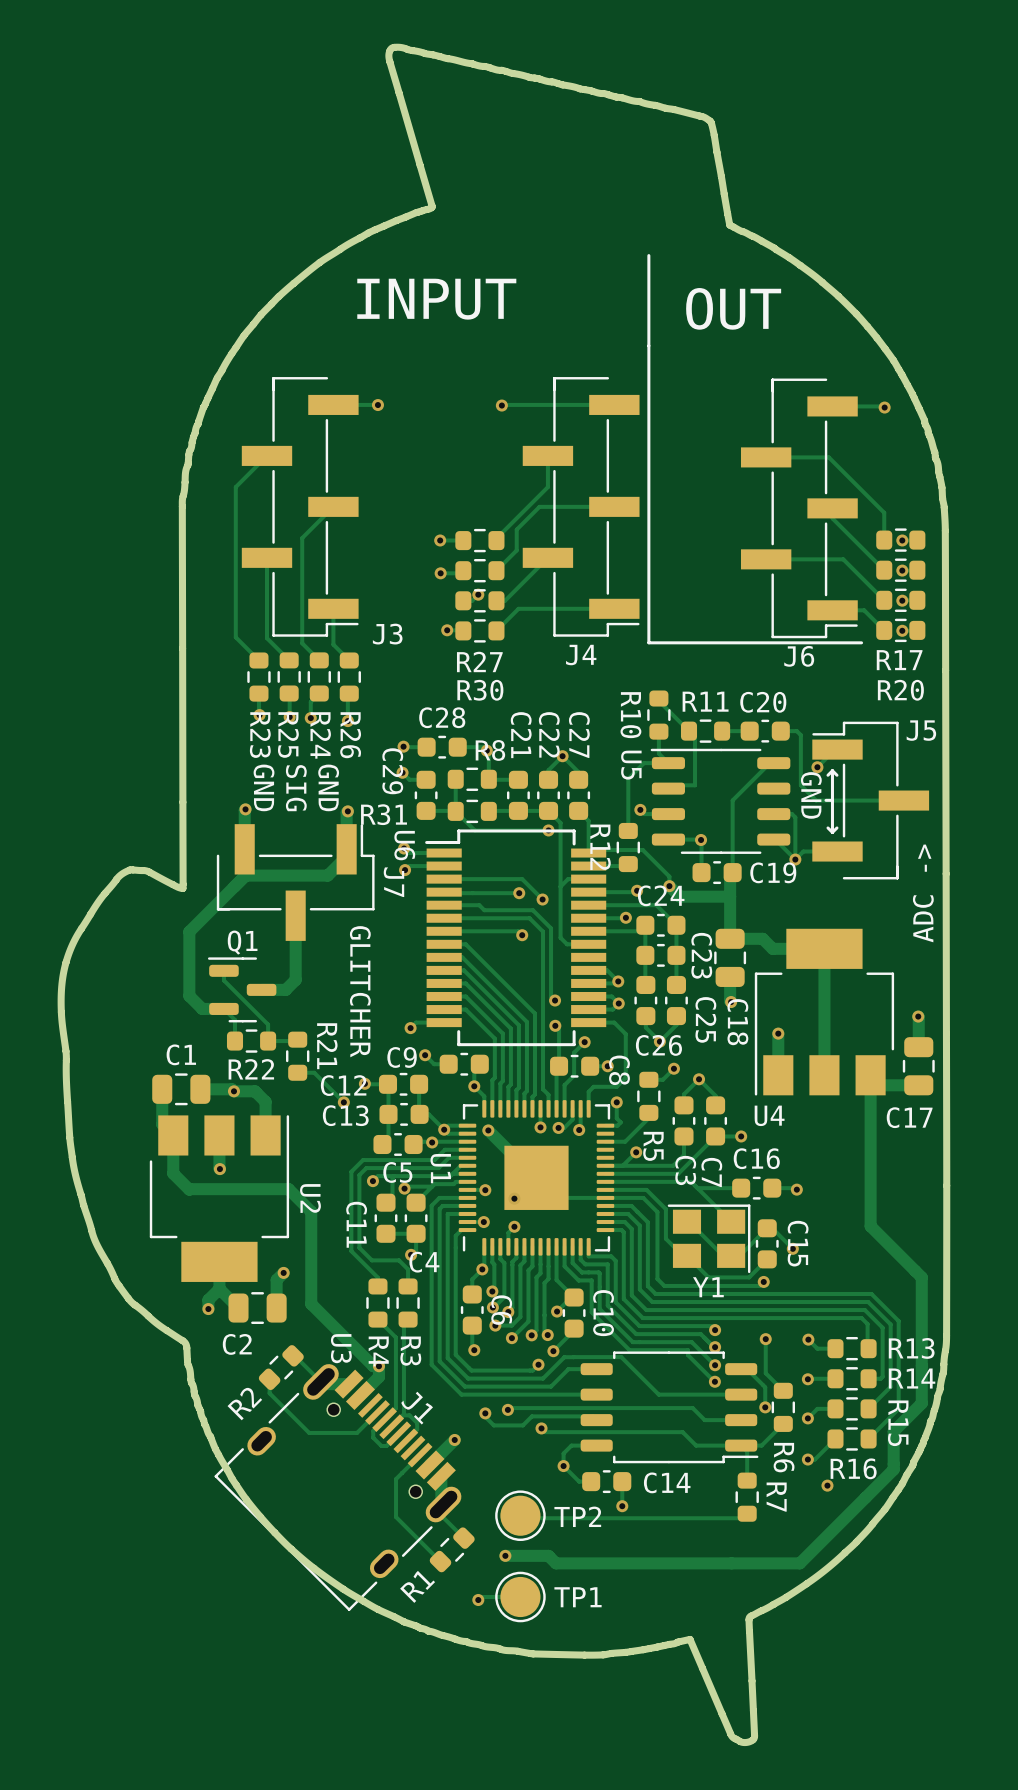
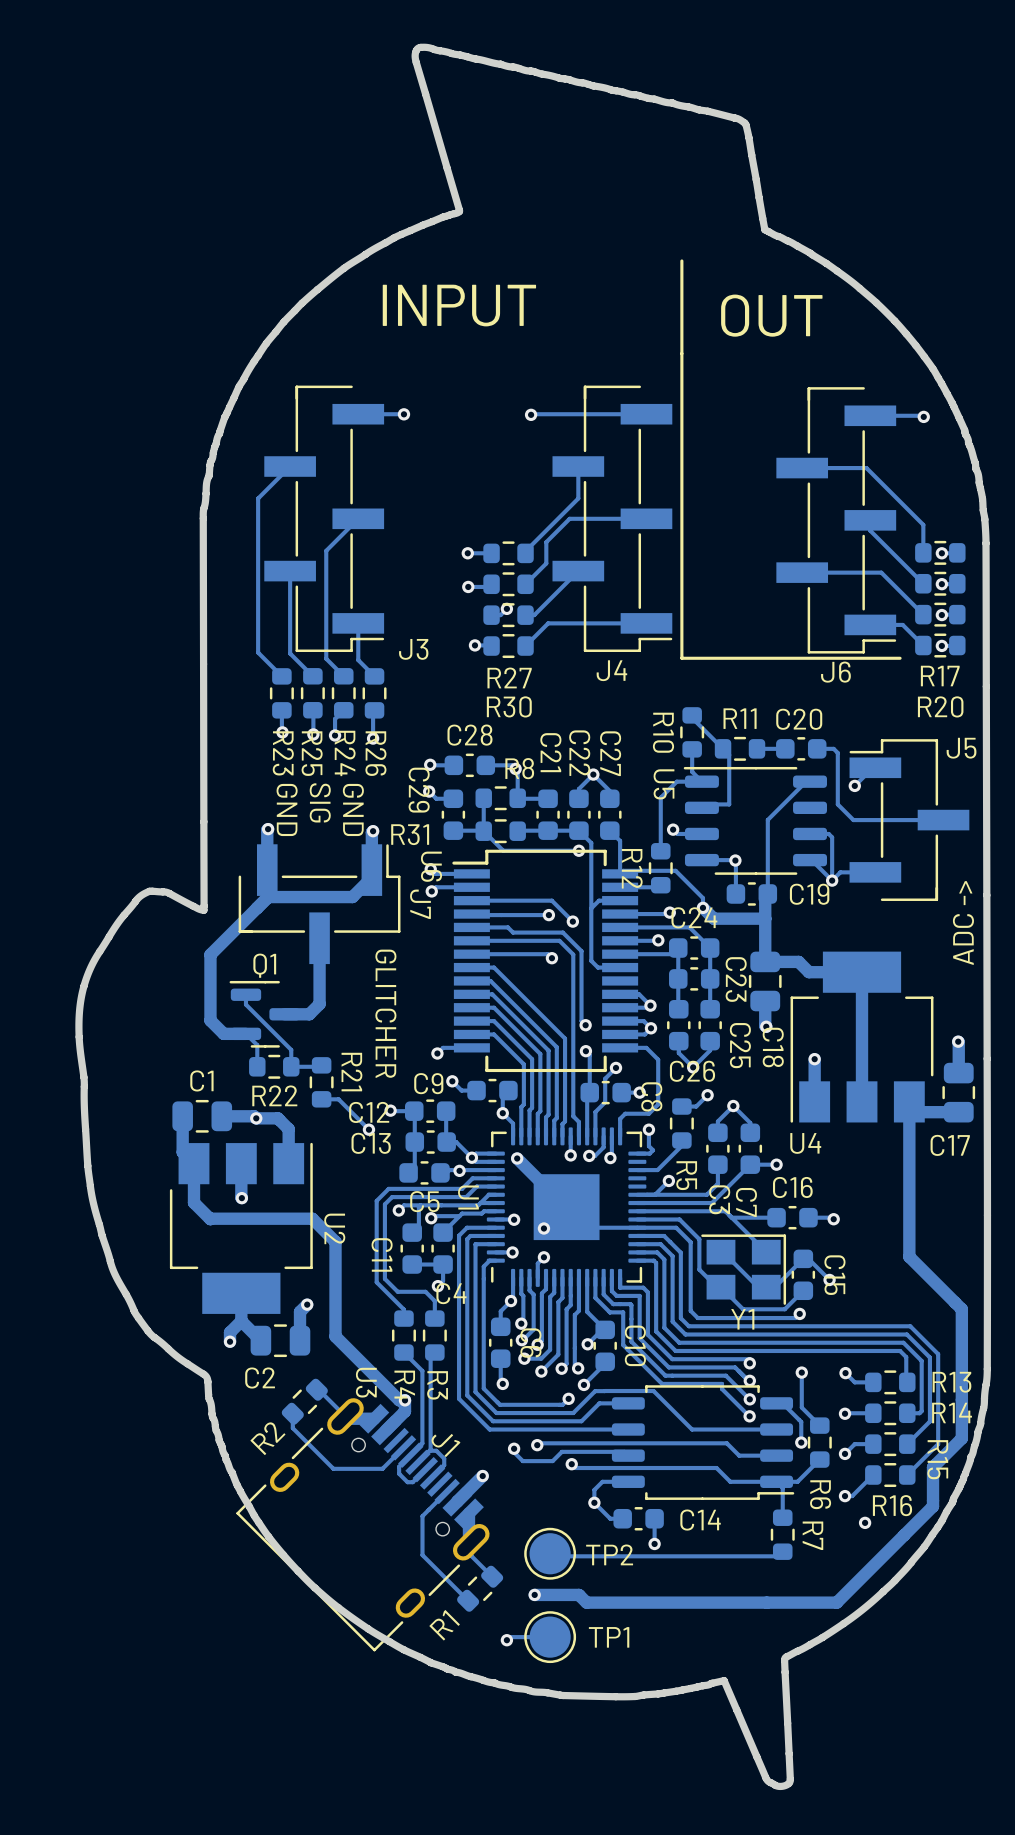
line: (832, 770) (827, 775) -> none
line: (832, 770) (836, 775) -> none
line: (832, 770) (832, 832) -> none
text: GND (811, 795) -> none
line: (832, 800) (825, 800) -> none
line: (827, 827) (832, 832) -> none
line: (836, 827) (832, 832) -> none

